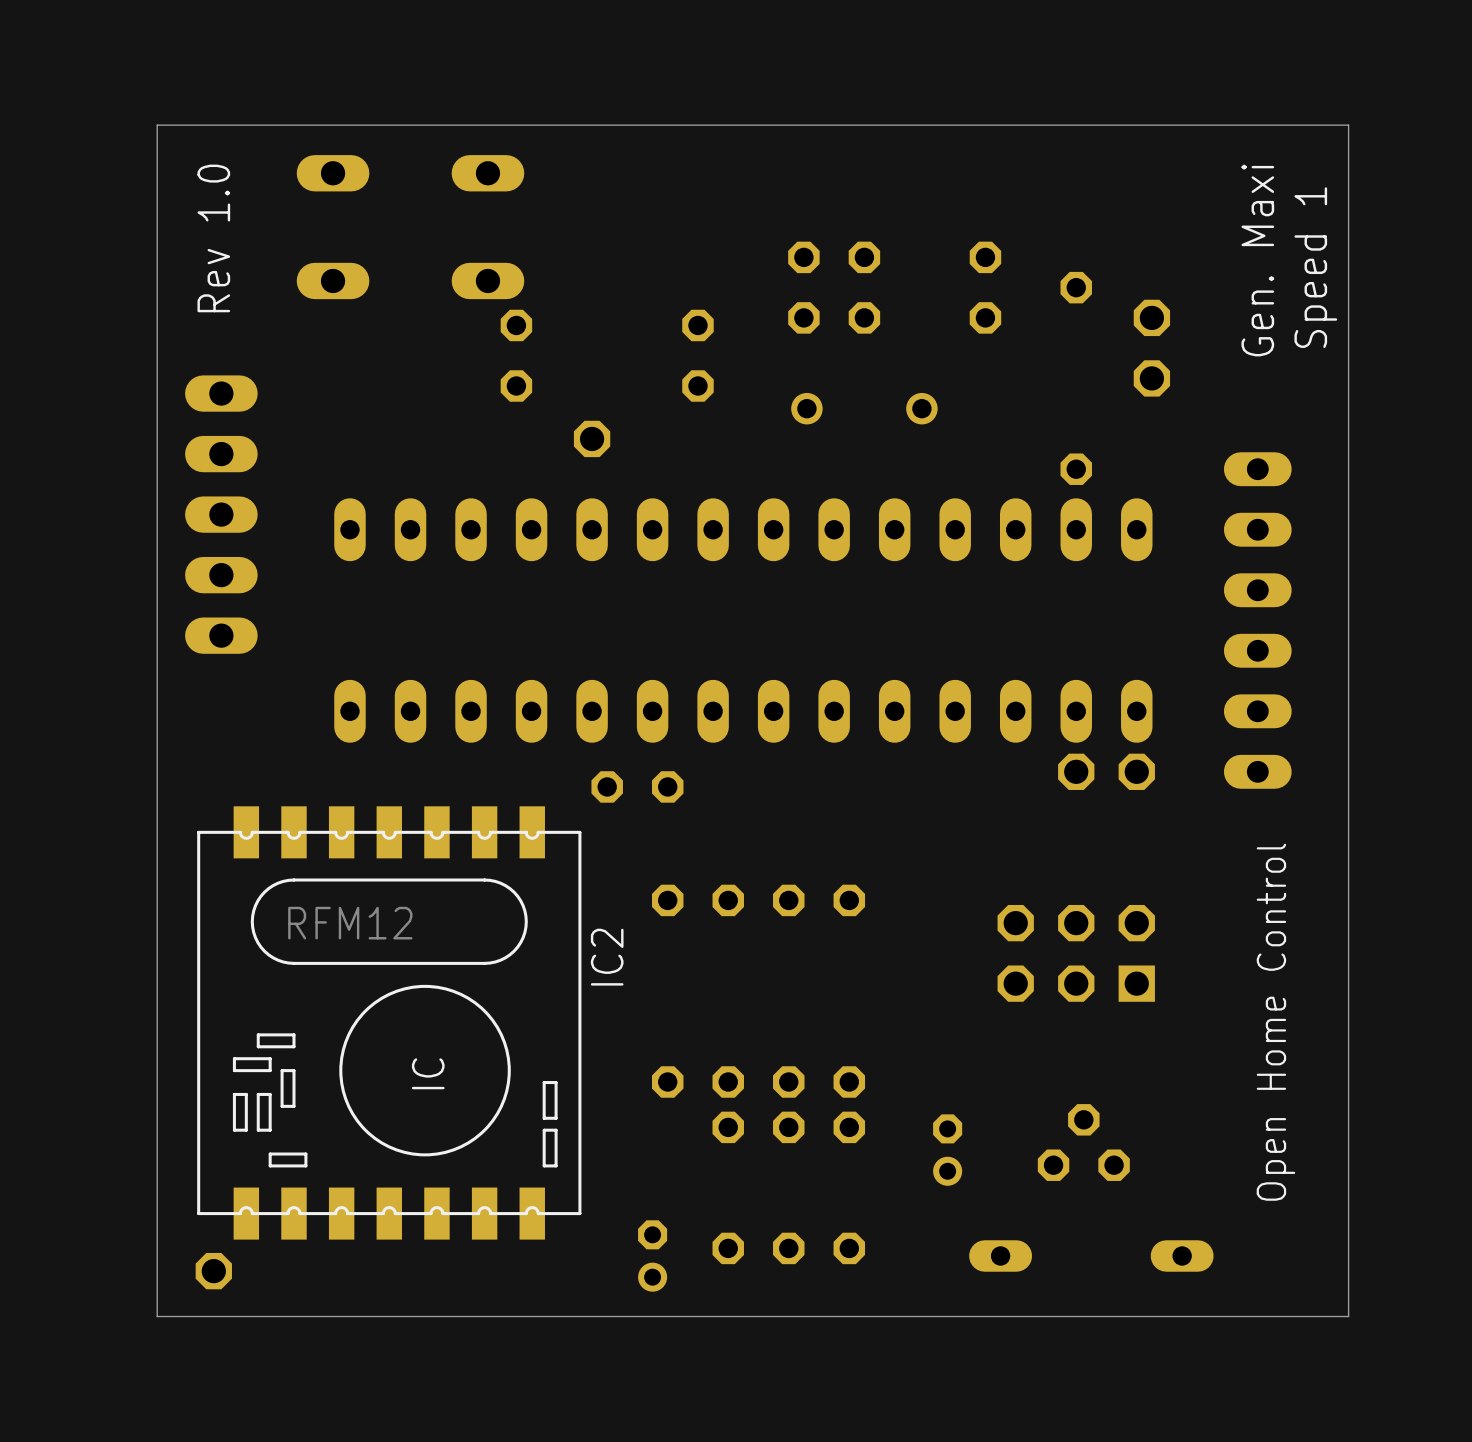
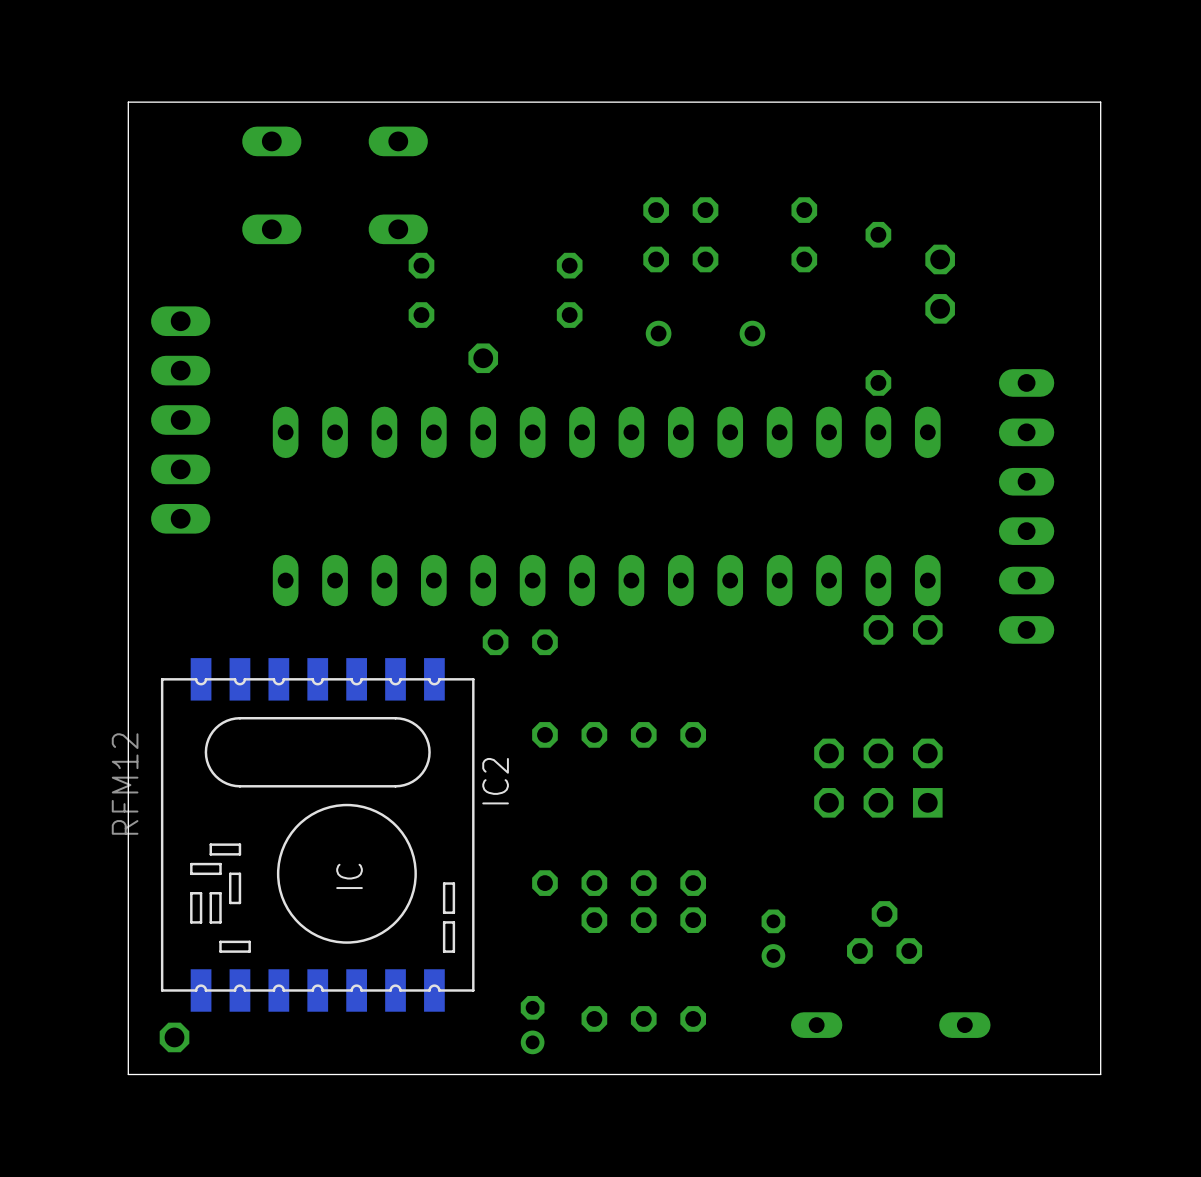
text: Rev 1.0 (213, 238) -> none
text: Gen. Maxi (1257, 260) -> none
text: Speed 1 (1315, 267) -> none
IC2 value rotation: 0° (350, 923) -> 90° counterclockwise (125, 784)
IC2 value position: RFM12 (350, 923) -> RFM12 (125, 784)
text: Open Home Control (1275, 1022) -> none

